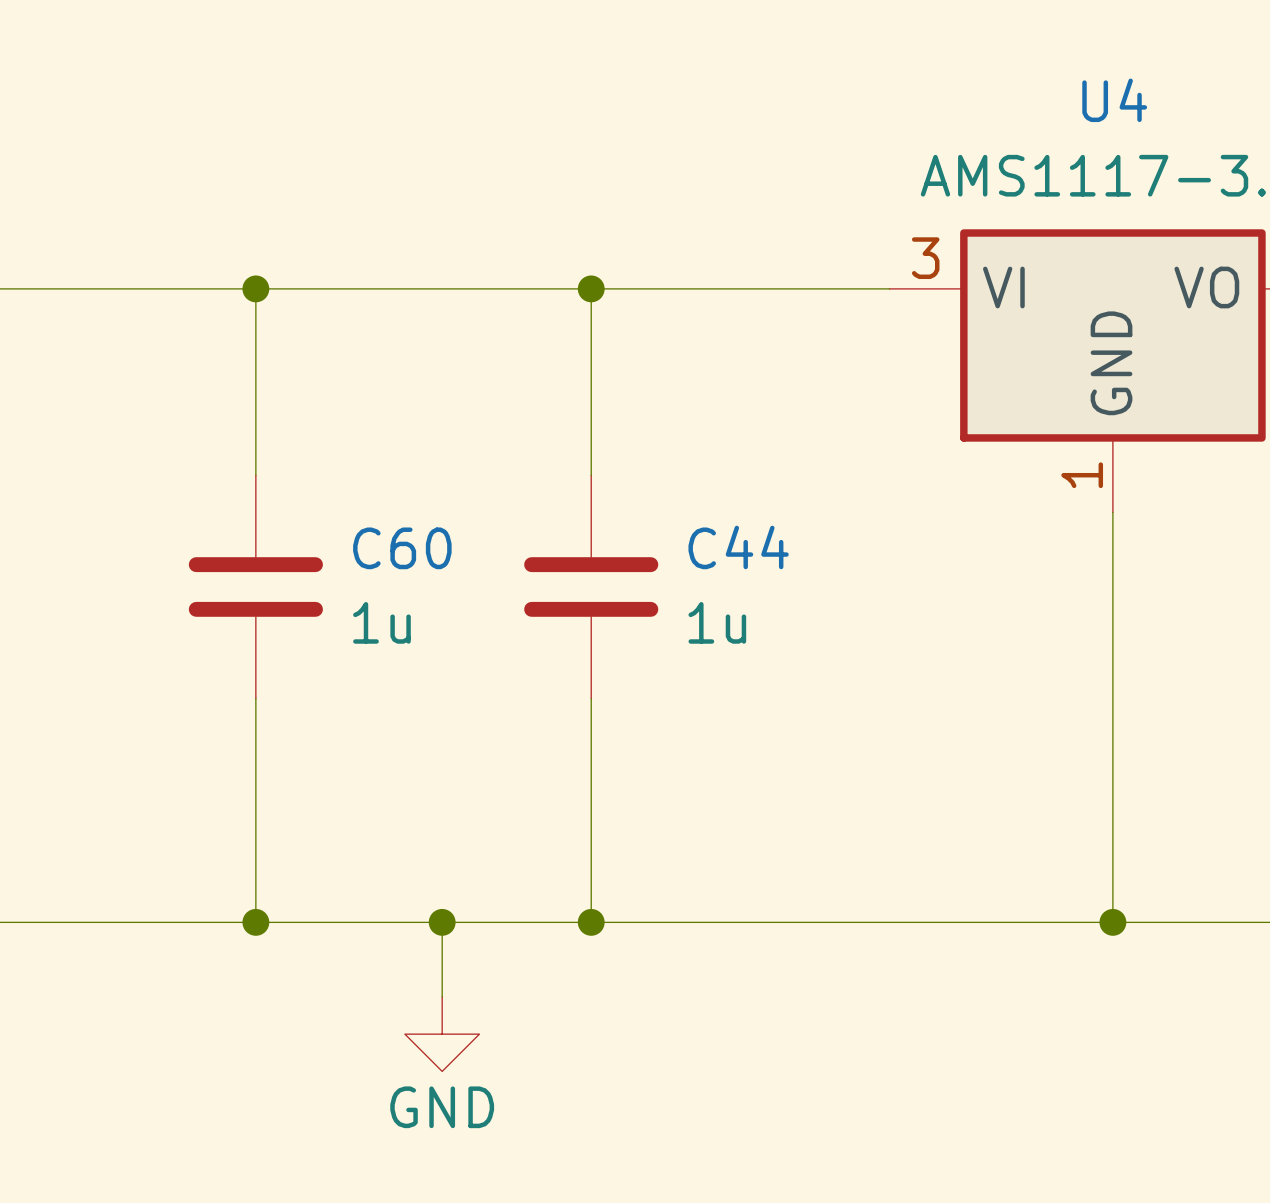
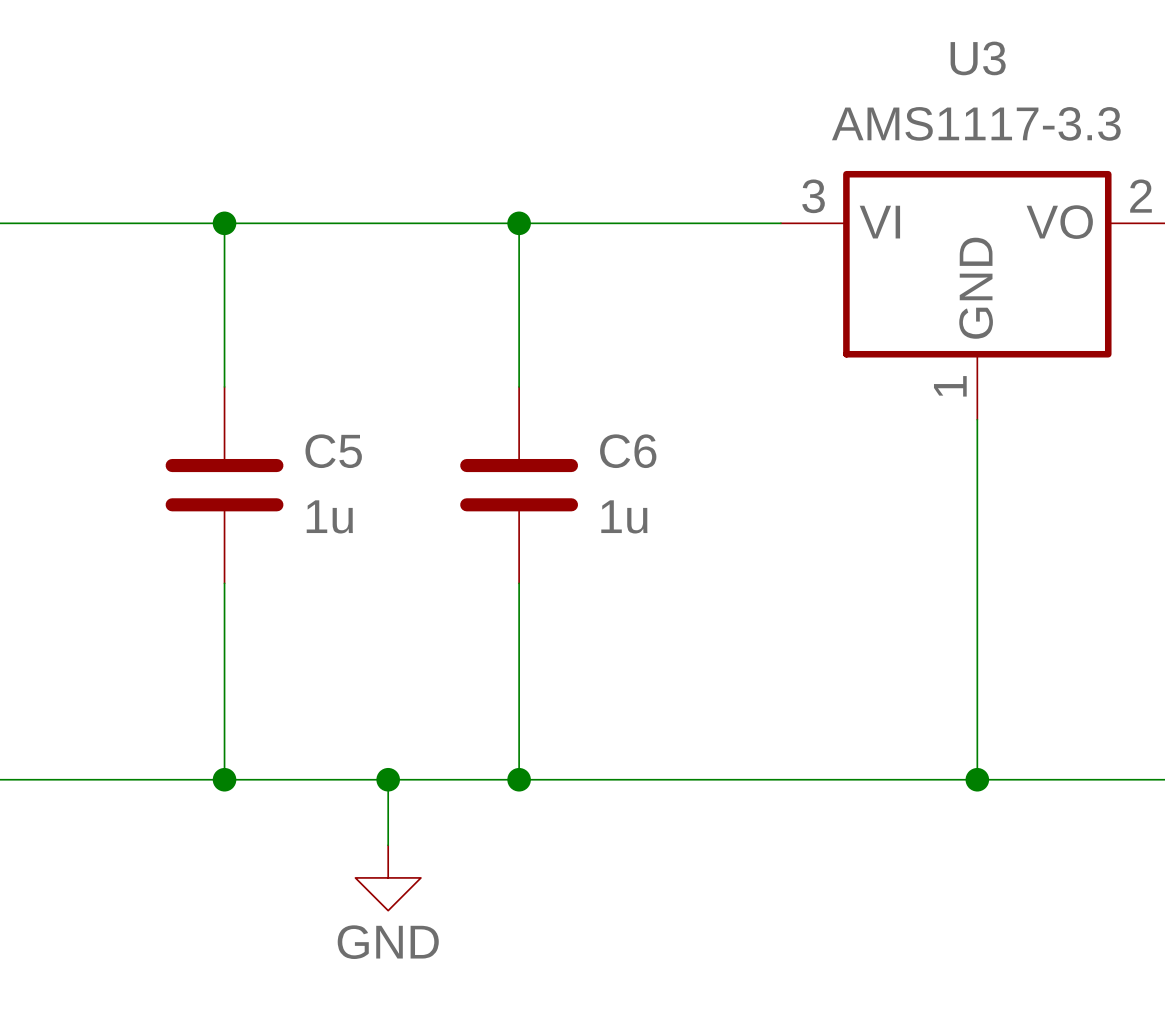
U4 name: U4 (1114, 100) -> U3 (978, 58)
C44 name: C44 (738, 547) -> C6 (628, 451)
C60 name: C60 (402, 548) -> C5 (333, 451)

